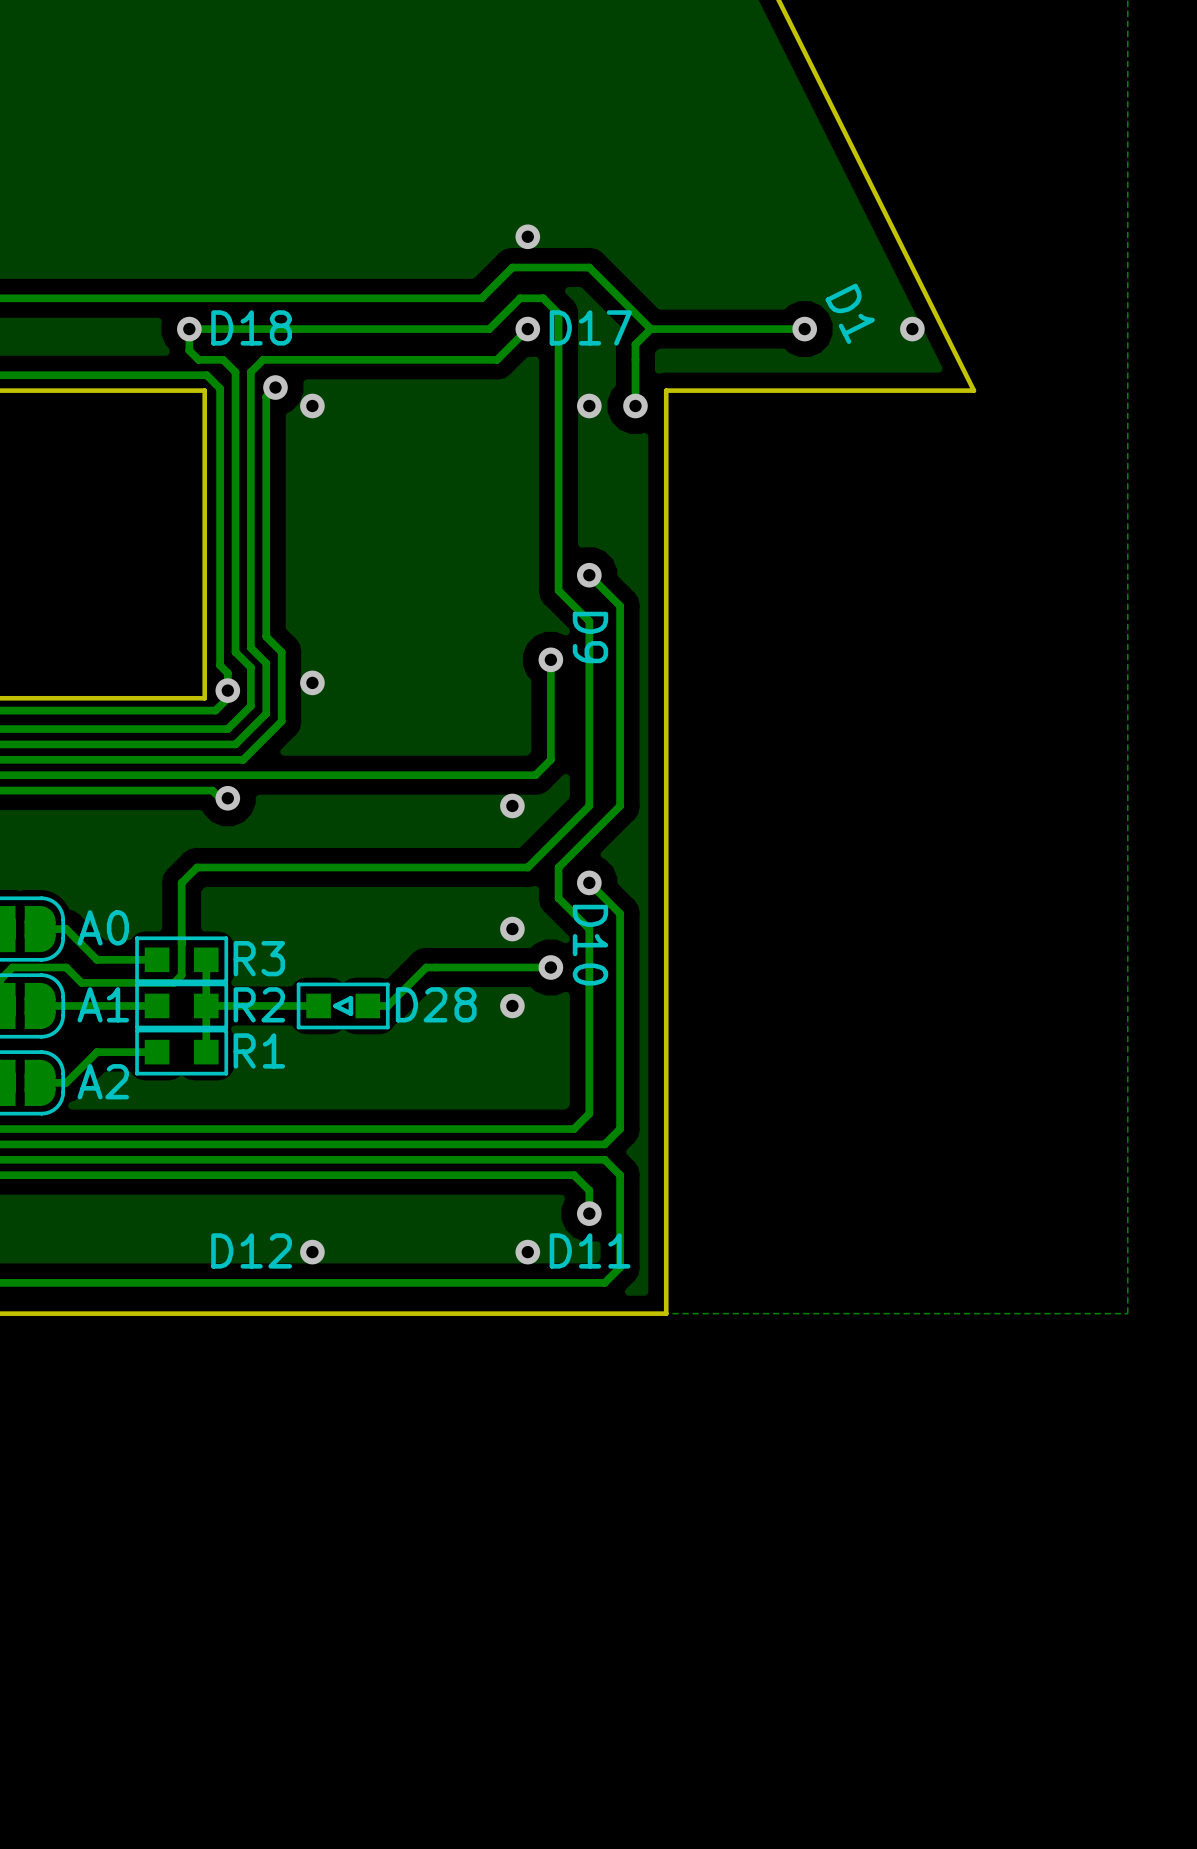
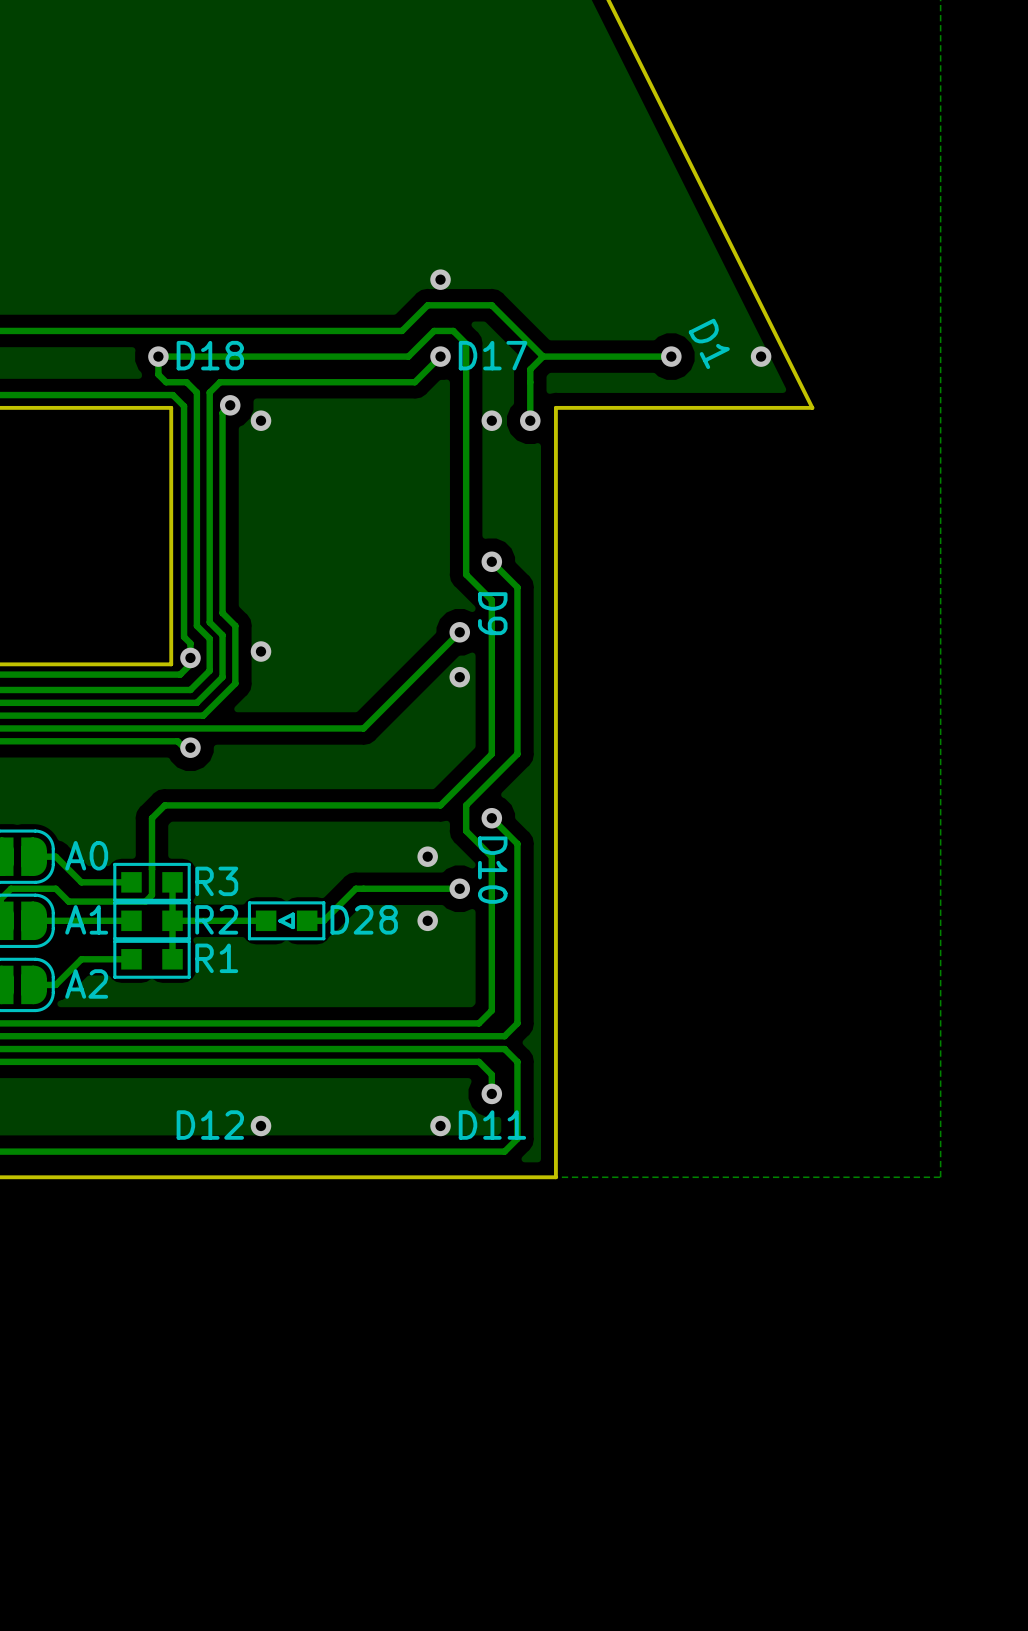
track: (550, 659) (550, 759) (535, 775) (435, 775) -> (459, 632) (363, 728)
via position: (512, 805) -> (459, 677)

